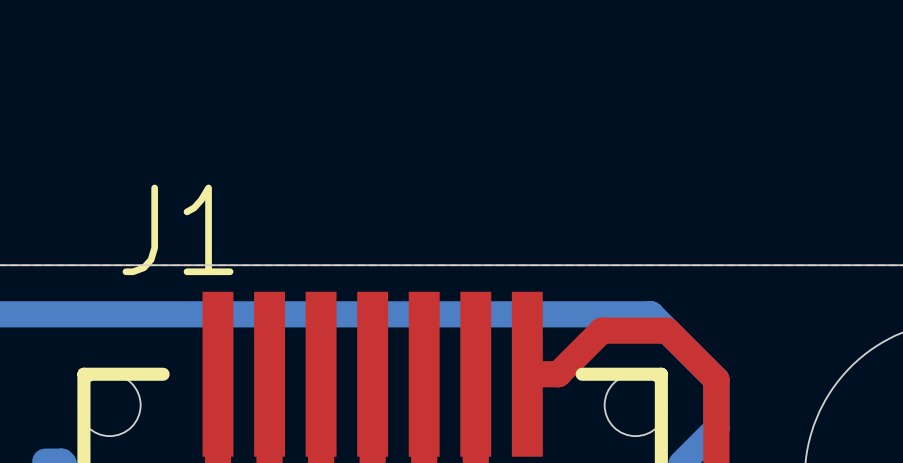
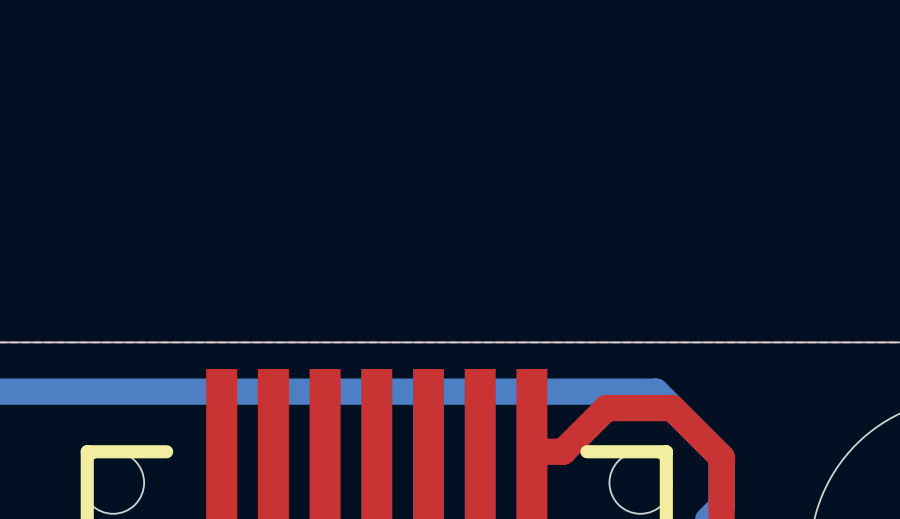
J1 name: J1 (178, 229) -> none

